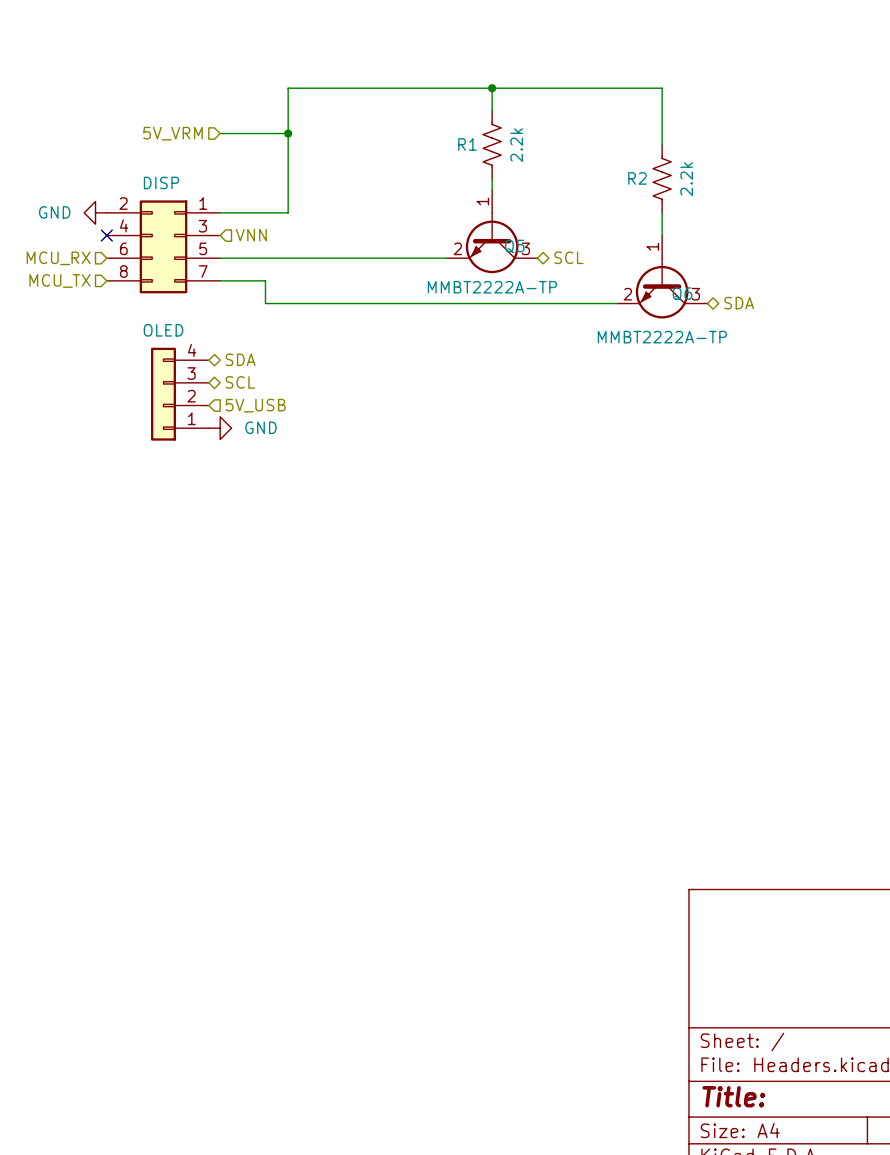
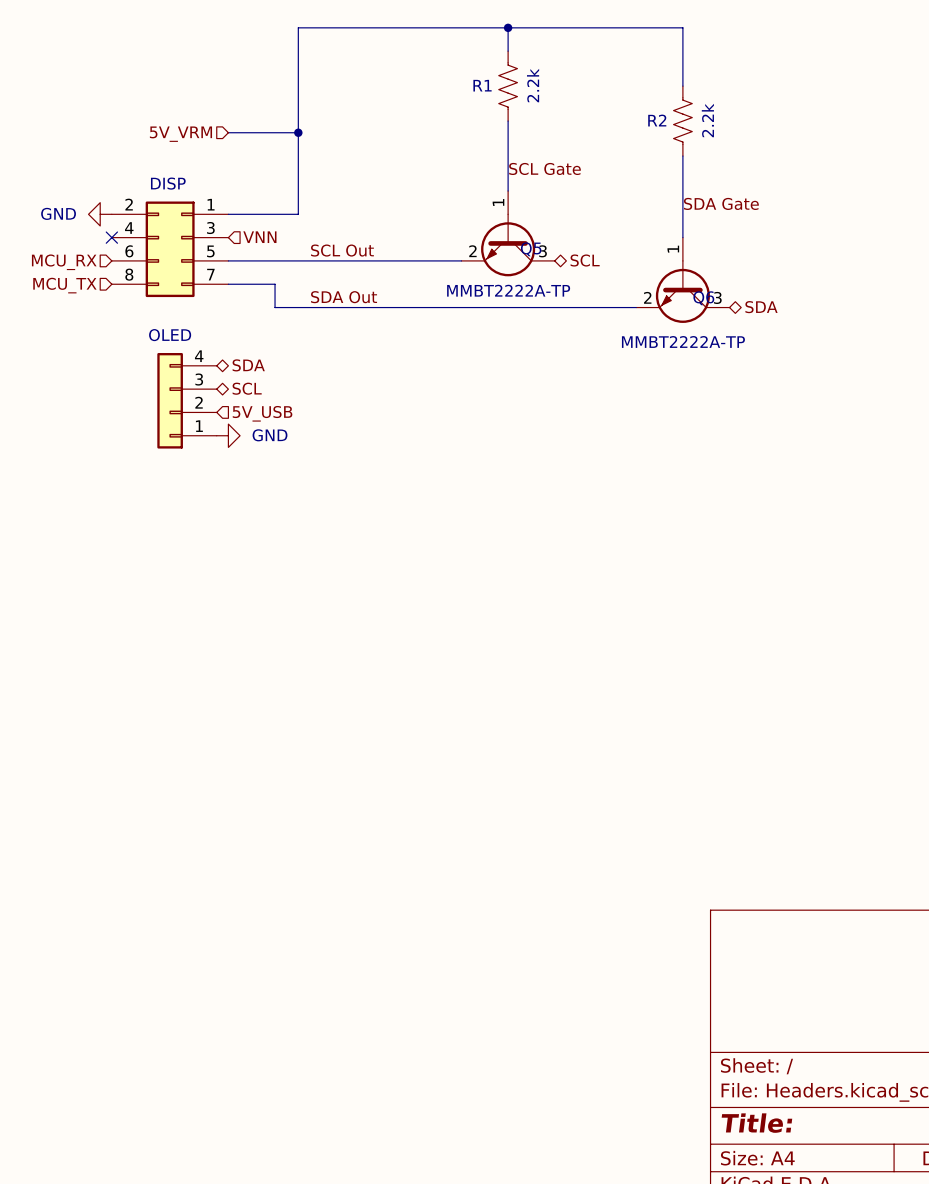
junction: none -> (508, 27)
wire: (288, 88) (662, 88) (662, 144) -> (298, 86) (298, 27) (682, 27) (682, 86)
wire: (492, 88) (492, 110) -> (508, 27) (508, 51)
junction: (492, 88) -> none
wire: none -> (508, 121) (508, 179)
R1 position: (492, 144) -> (508, 86)
wire: none -> (682, 156) (682, 214)
label: none -> SCL Gate (544, 168)
R2 position: (662, 178) -> (682, 121)
label: none -> SDA Gate (721, 203)
label: none -> SCL Out (342, 250)
label: none -> SDA Out (344, 297)

